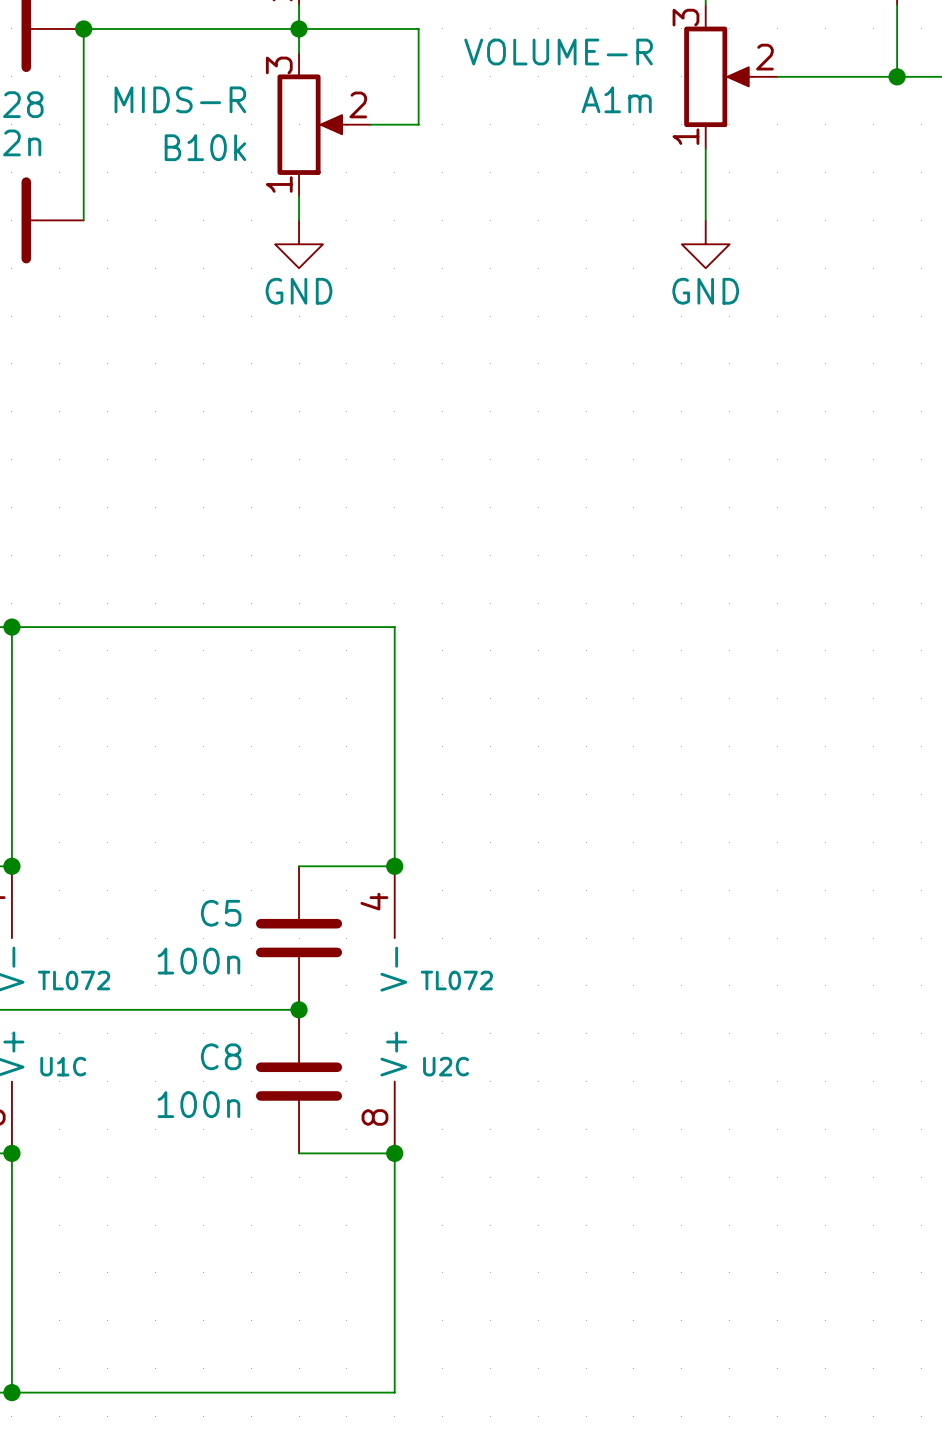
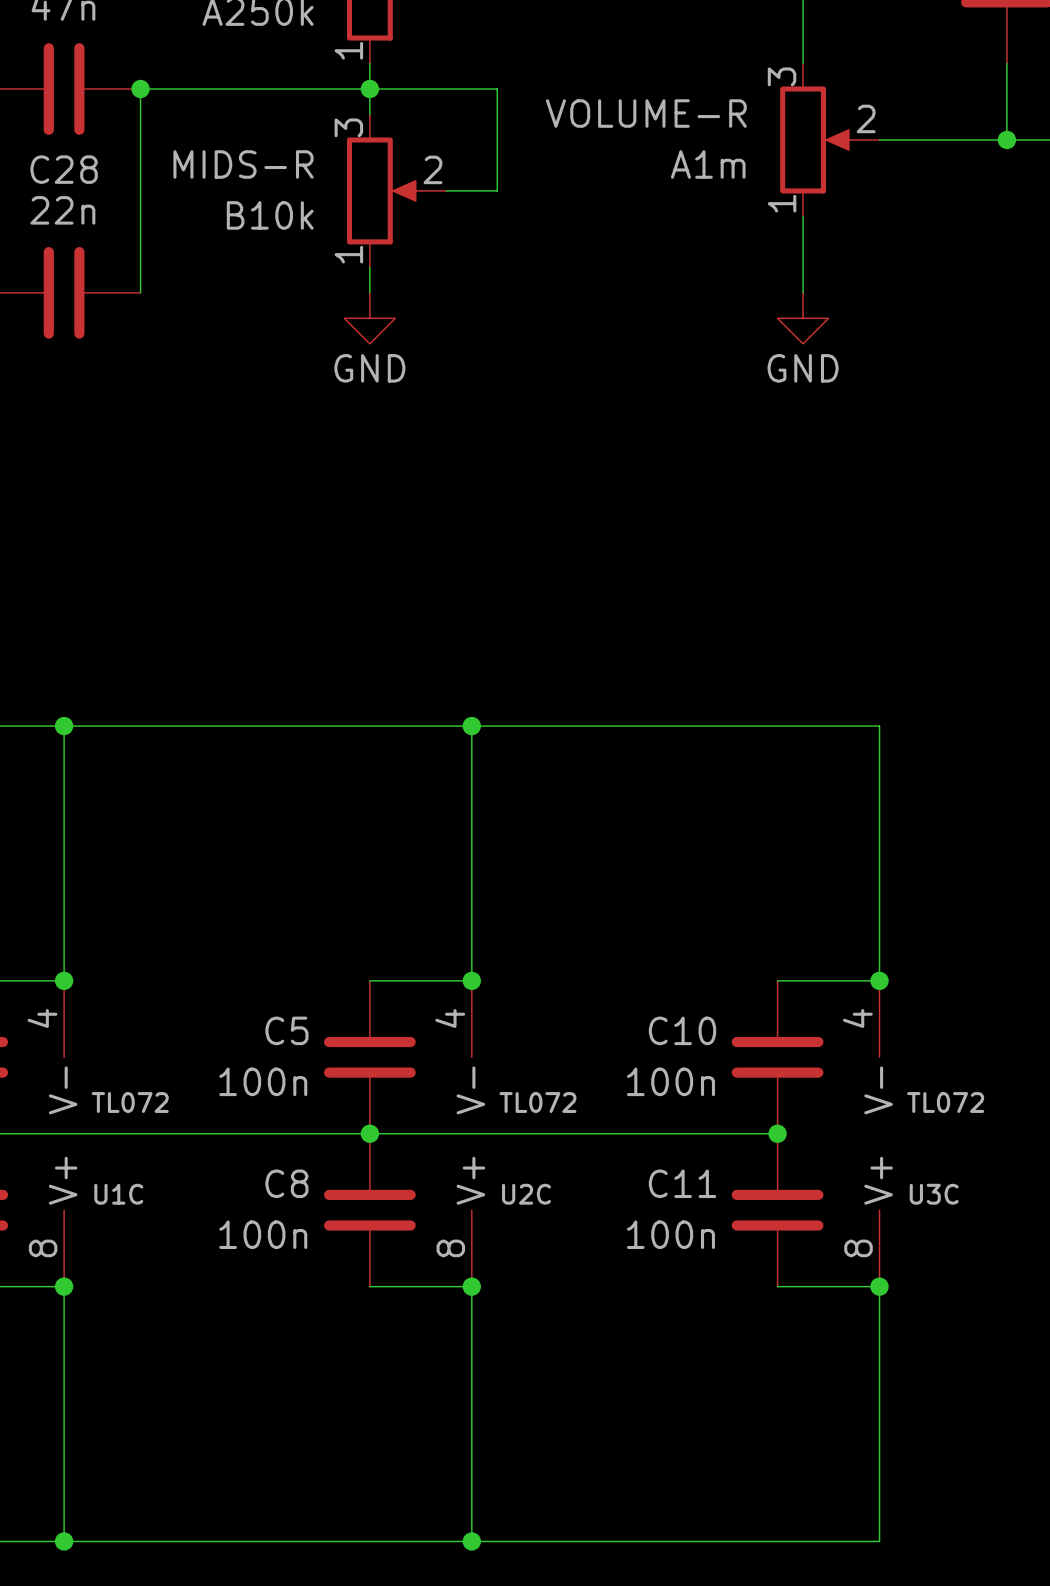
wire: none -> (471, 726) (879, 726) (879, 980) (777, 980)
junction: none -> (471, 726)
junction: none -> (879, 980)
C10: none -> 100n (777, 1057)
wire: none -> (369, 1133) (777, 1133)
junction: none -> (777, 1133)
U3C: none -> TL072 (879, 1133)
C11: none -> 100n (777, 1210)
wire: none -> (777, 1286) (879, 1286) (879, 1541) (471, 1541)
junction: none -> (879, 1286)
junction: none -> (471, 1541)

